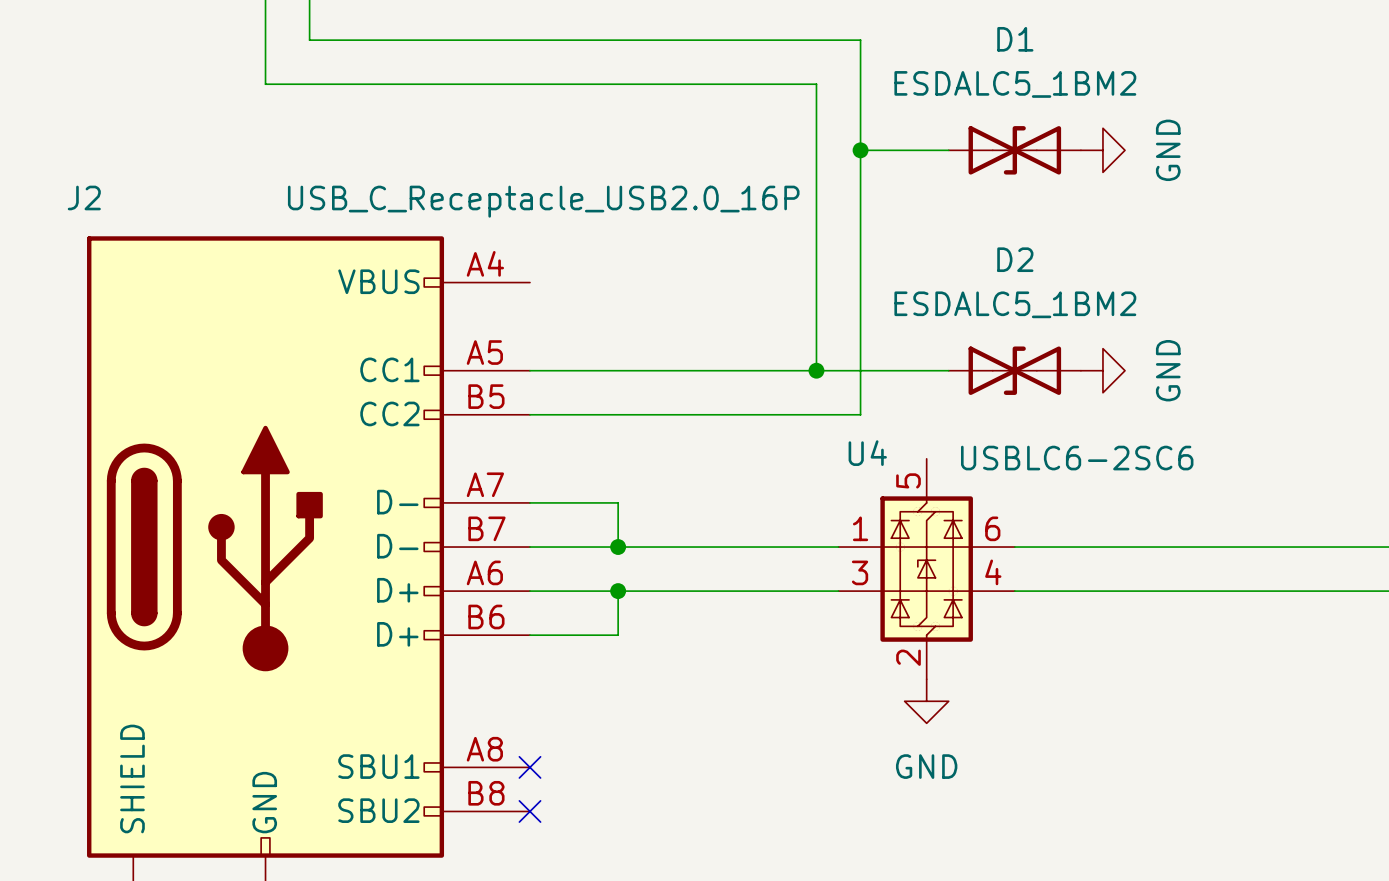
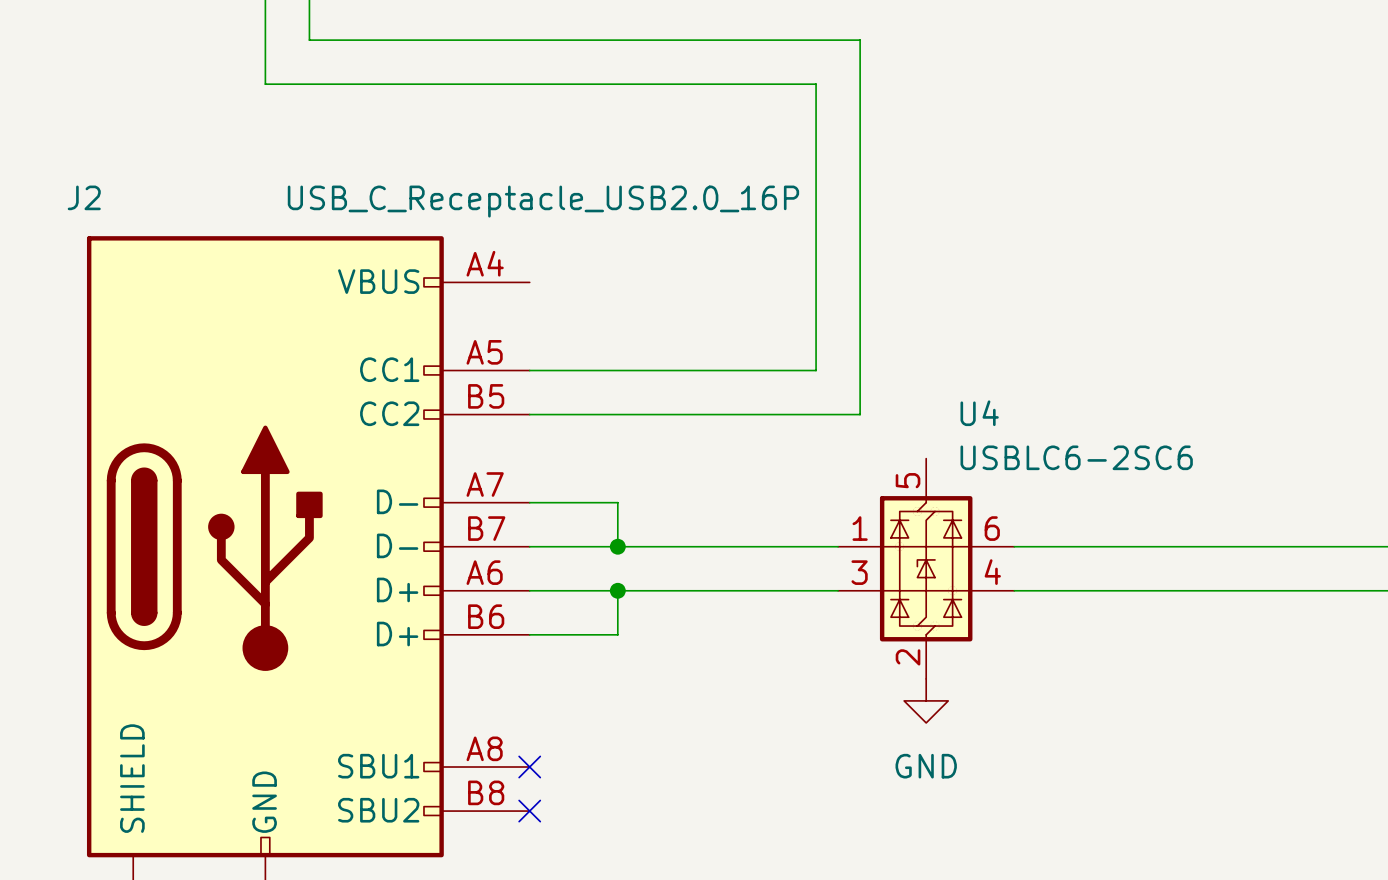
wire: (860, 150) (948, 150) -> none
junction: (860, 150) -> none
D1: ESDALC5_1BM2 (1014, 150) -> none
power symbol: GND (1102, 150) -> none
wire: (816, 370) (948, 370) -> none
junction: (816, 370) -> none
D2: ESDALC5_1BM2 (1014, 370) -> none
power symbol: GND (1102, 370) -> none
U4 name position: U4 (867, 453) -> U4 (979, 413)

